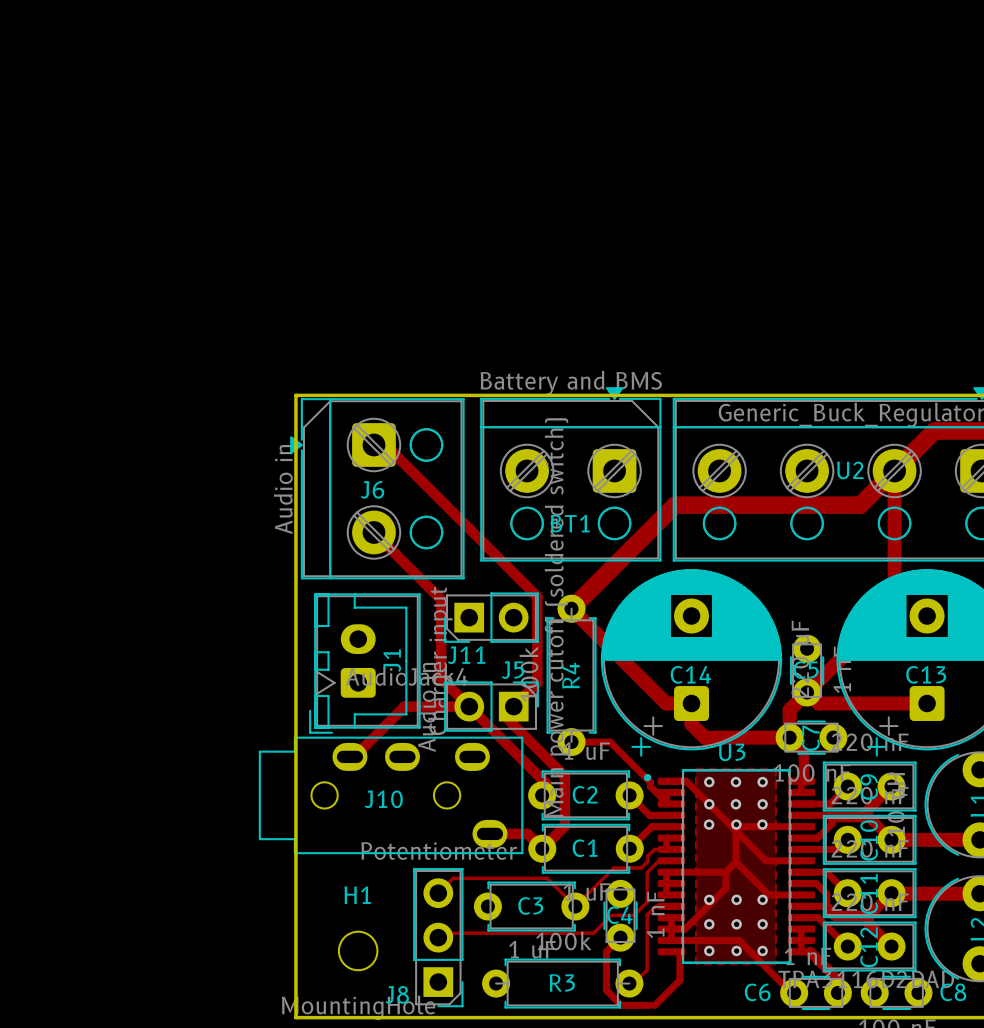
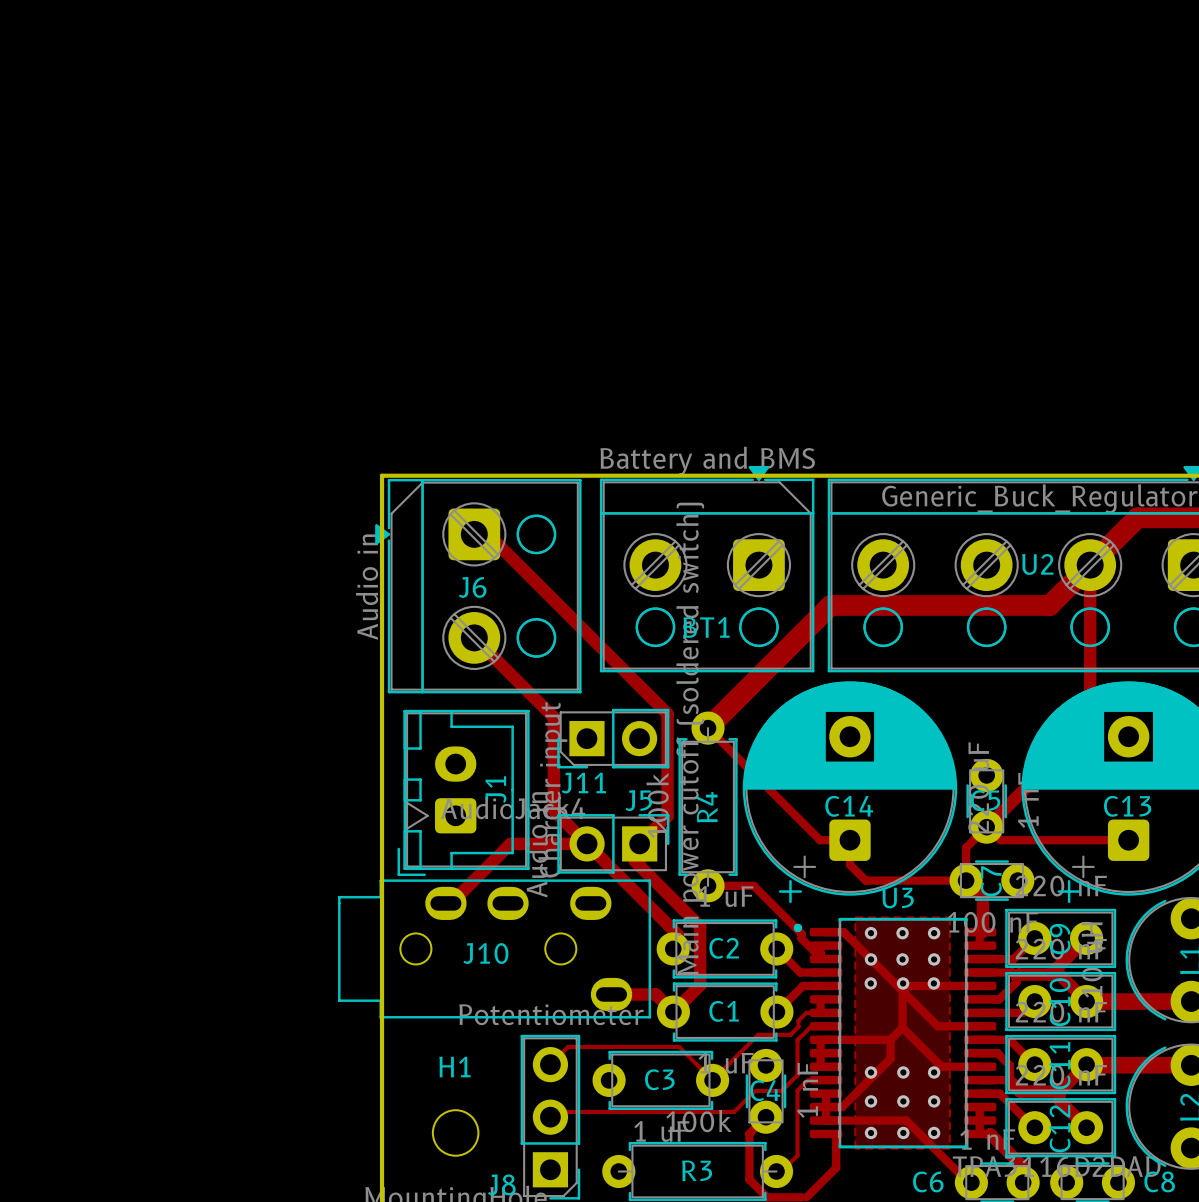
track width: thick (894, 470) (894, 605) (789, 709) (789, 737) (704, 737) (691, 724) (691, 703) (666, 703) (571, 608) -> thin (1090, 565) (1090, 723) (966, 847) (966, 880) (865, 880) (849, 864) (849, 840) (820, 840) (708, 728)
track width: thick (807, 692) (818, 703) (927, 703) -> thin (986, 827) (1000, 840) (1128, 840)

